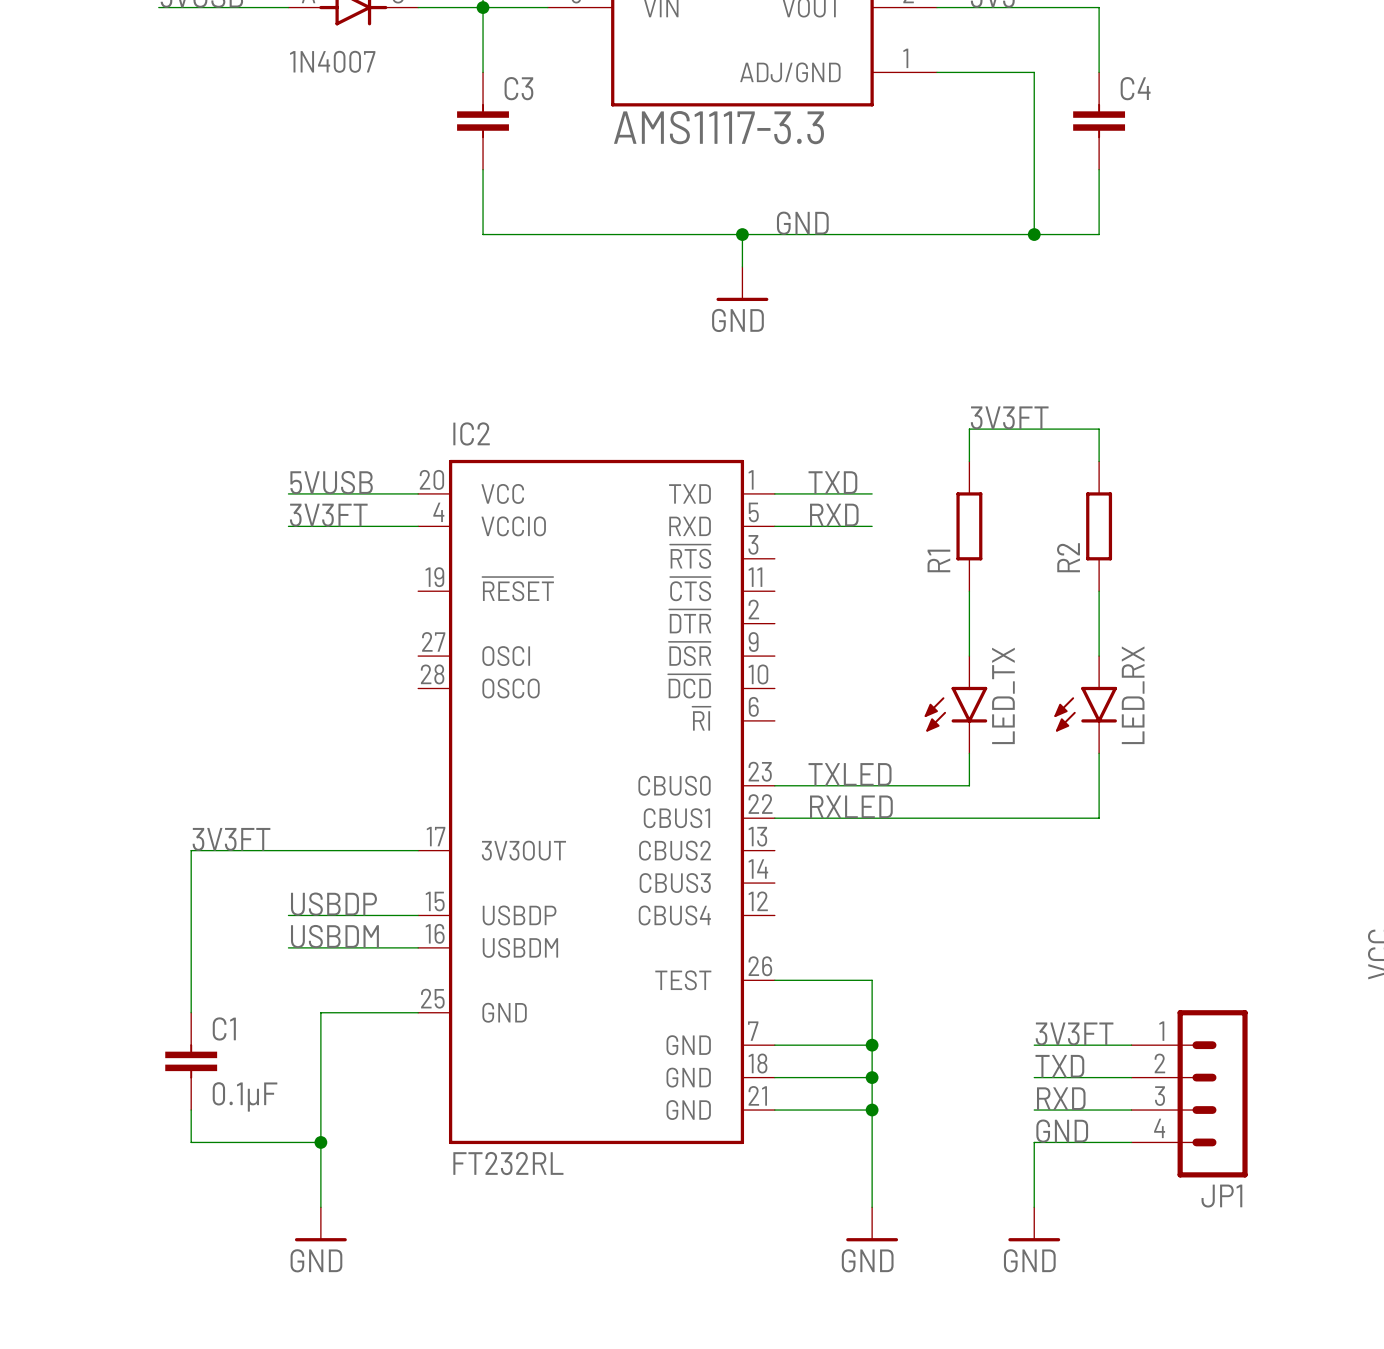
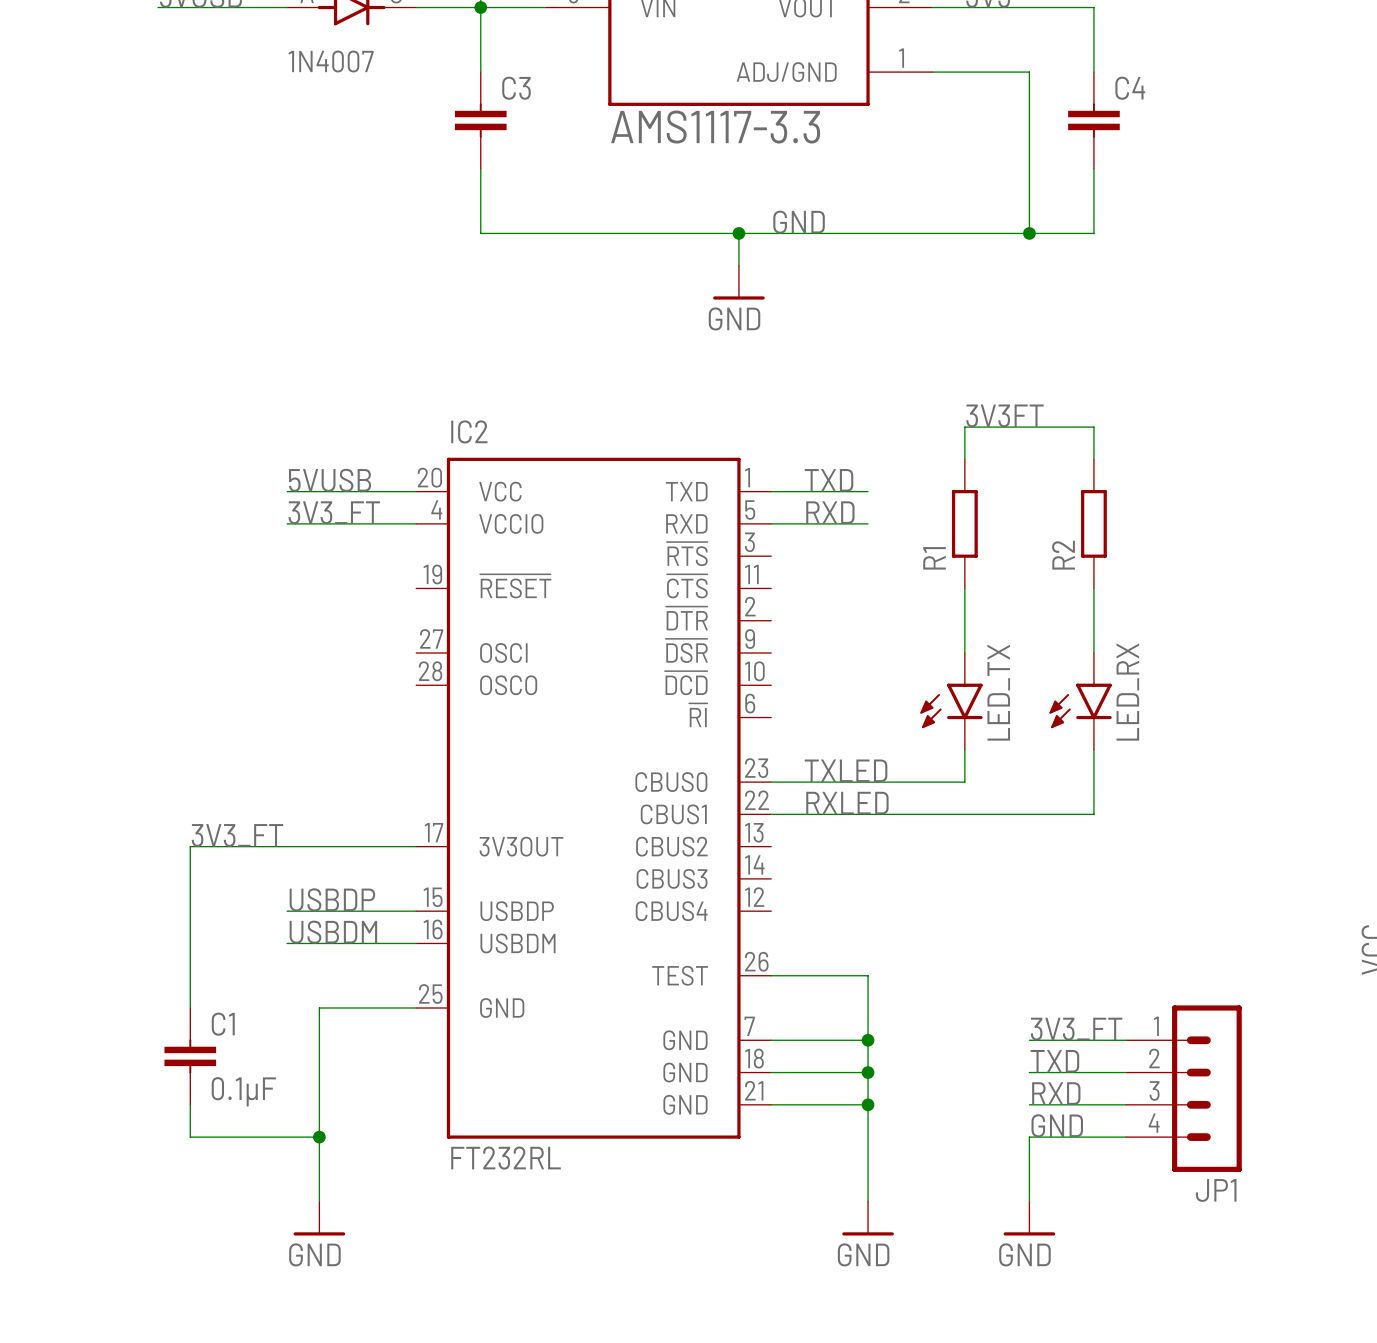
label: 3V3FT (328, 515) -> 3V3_FT (334, 512)
label: 3V3FT (231, 839) -> 3V3_FT (237, 835)
label: 3V3FT (1074, 1033) -> 3V3_FT (1076, 1029)

